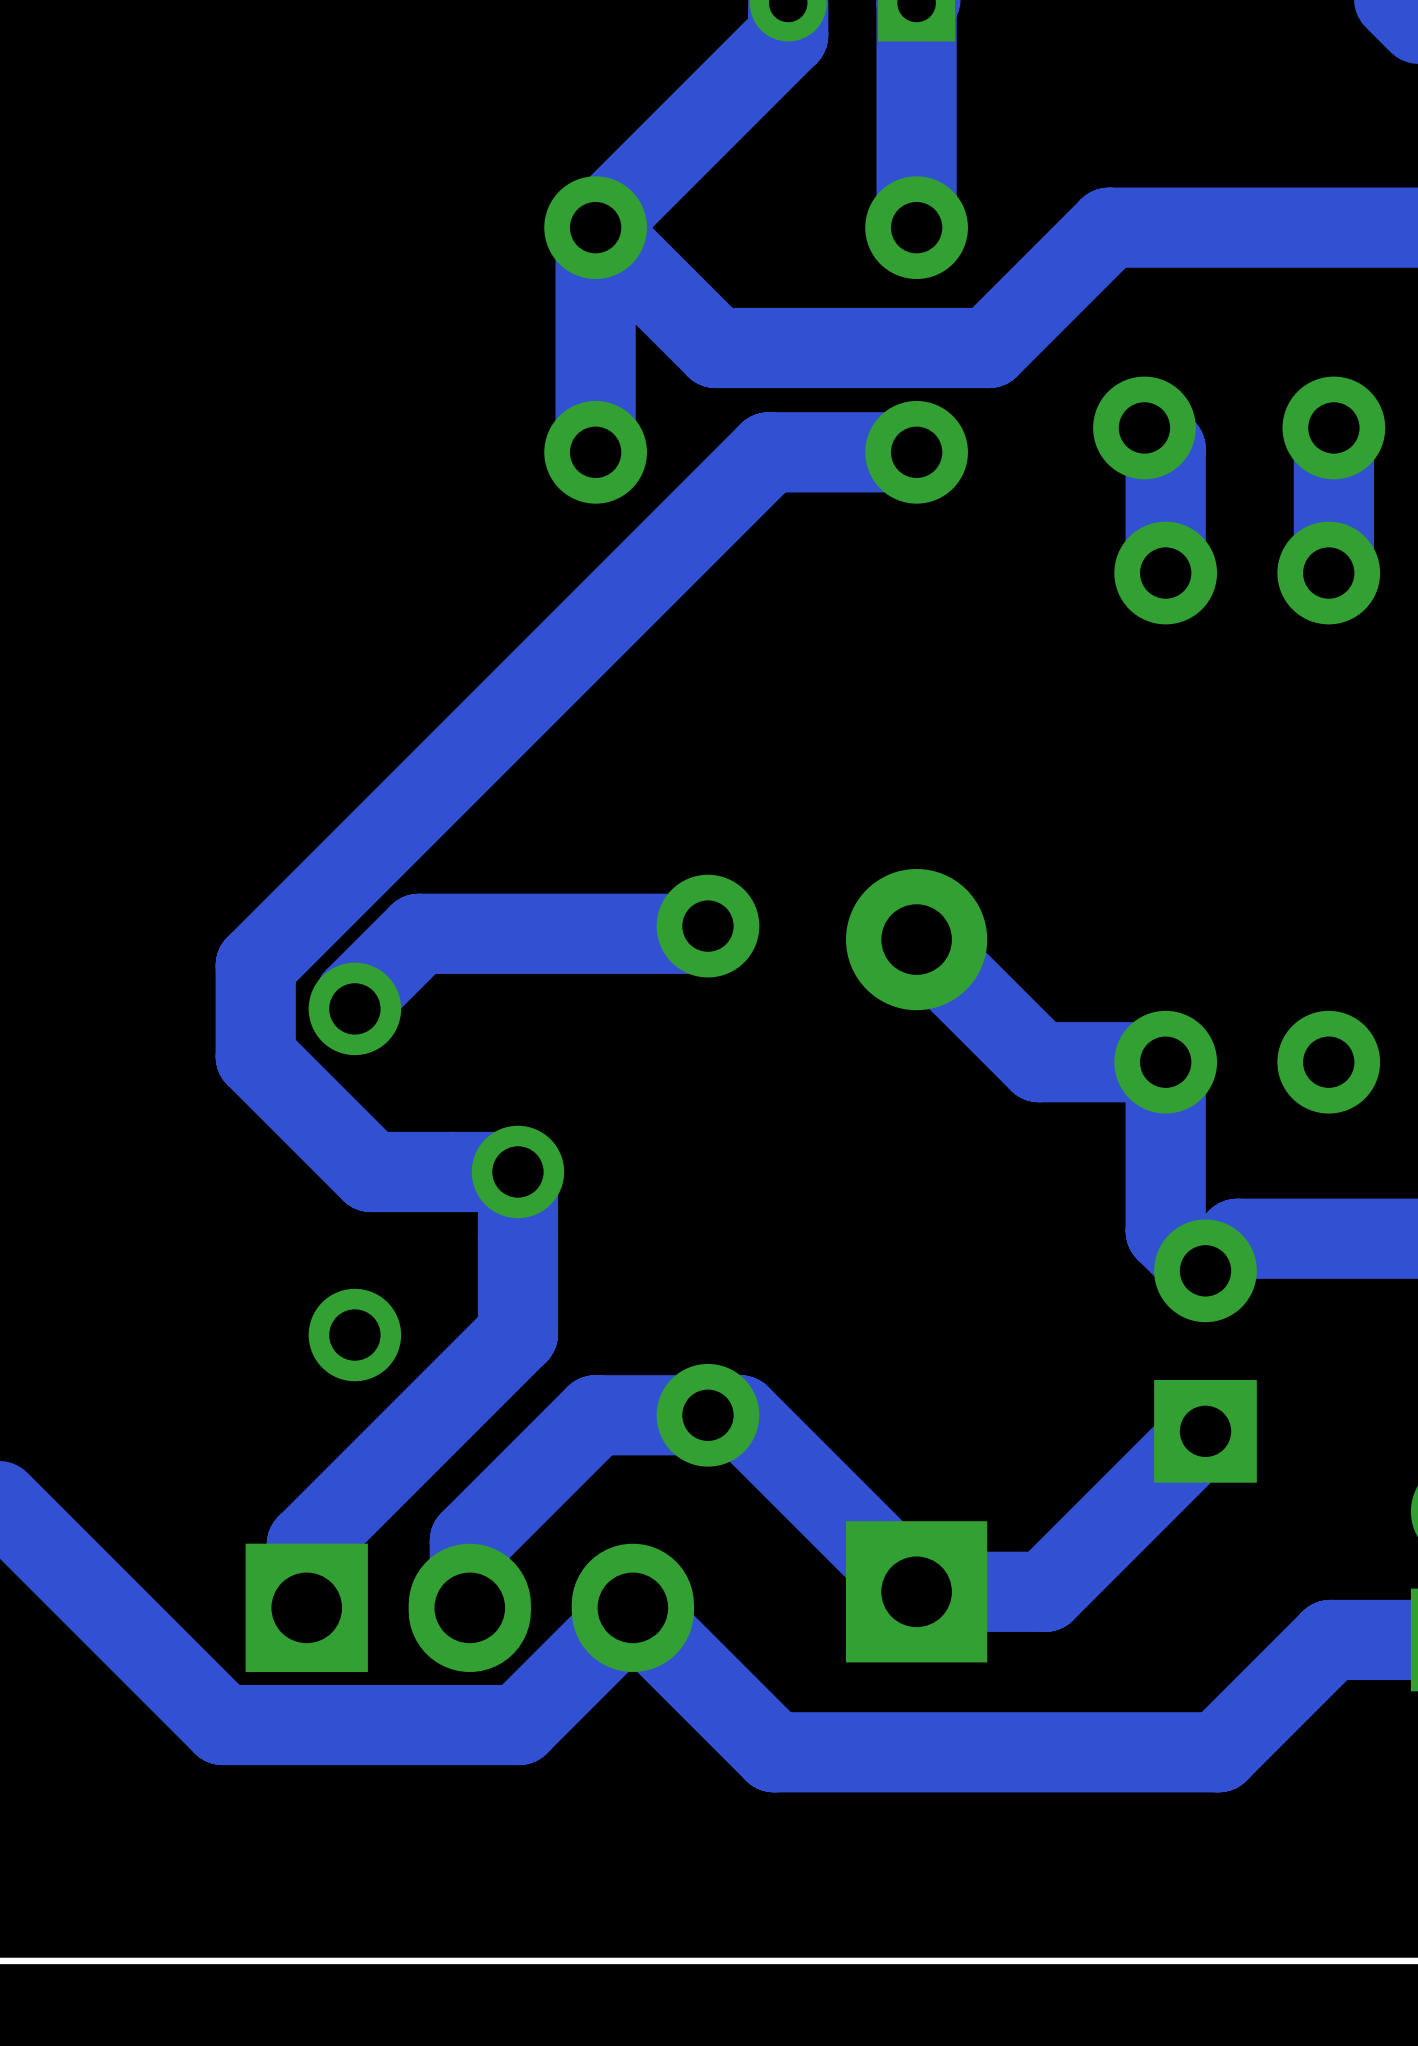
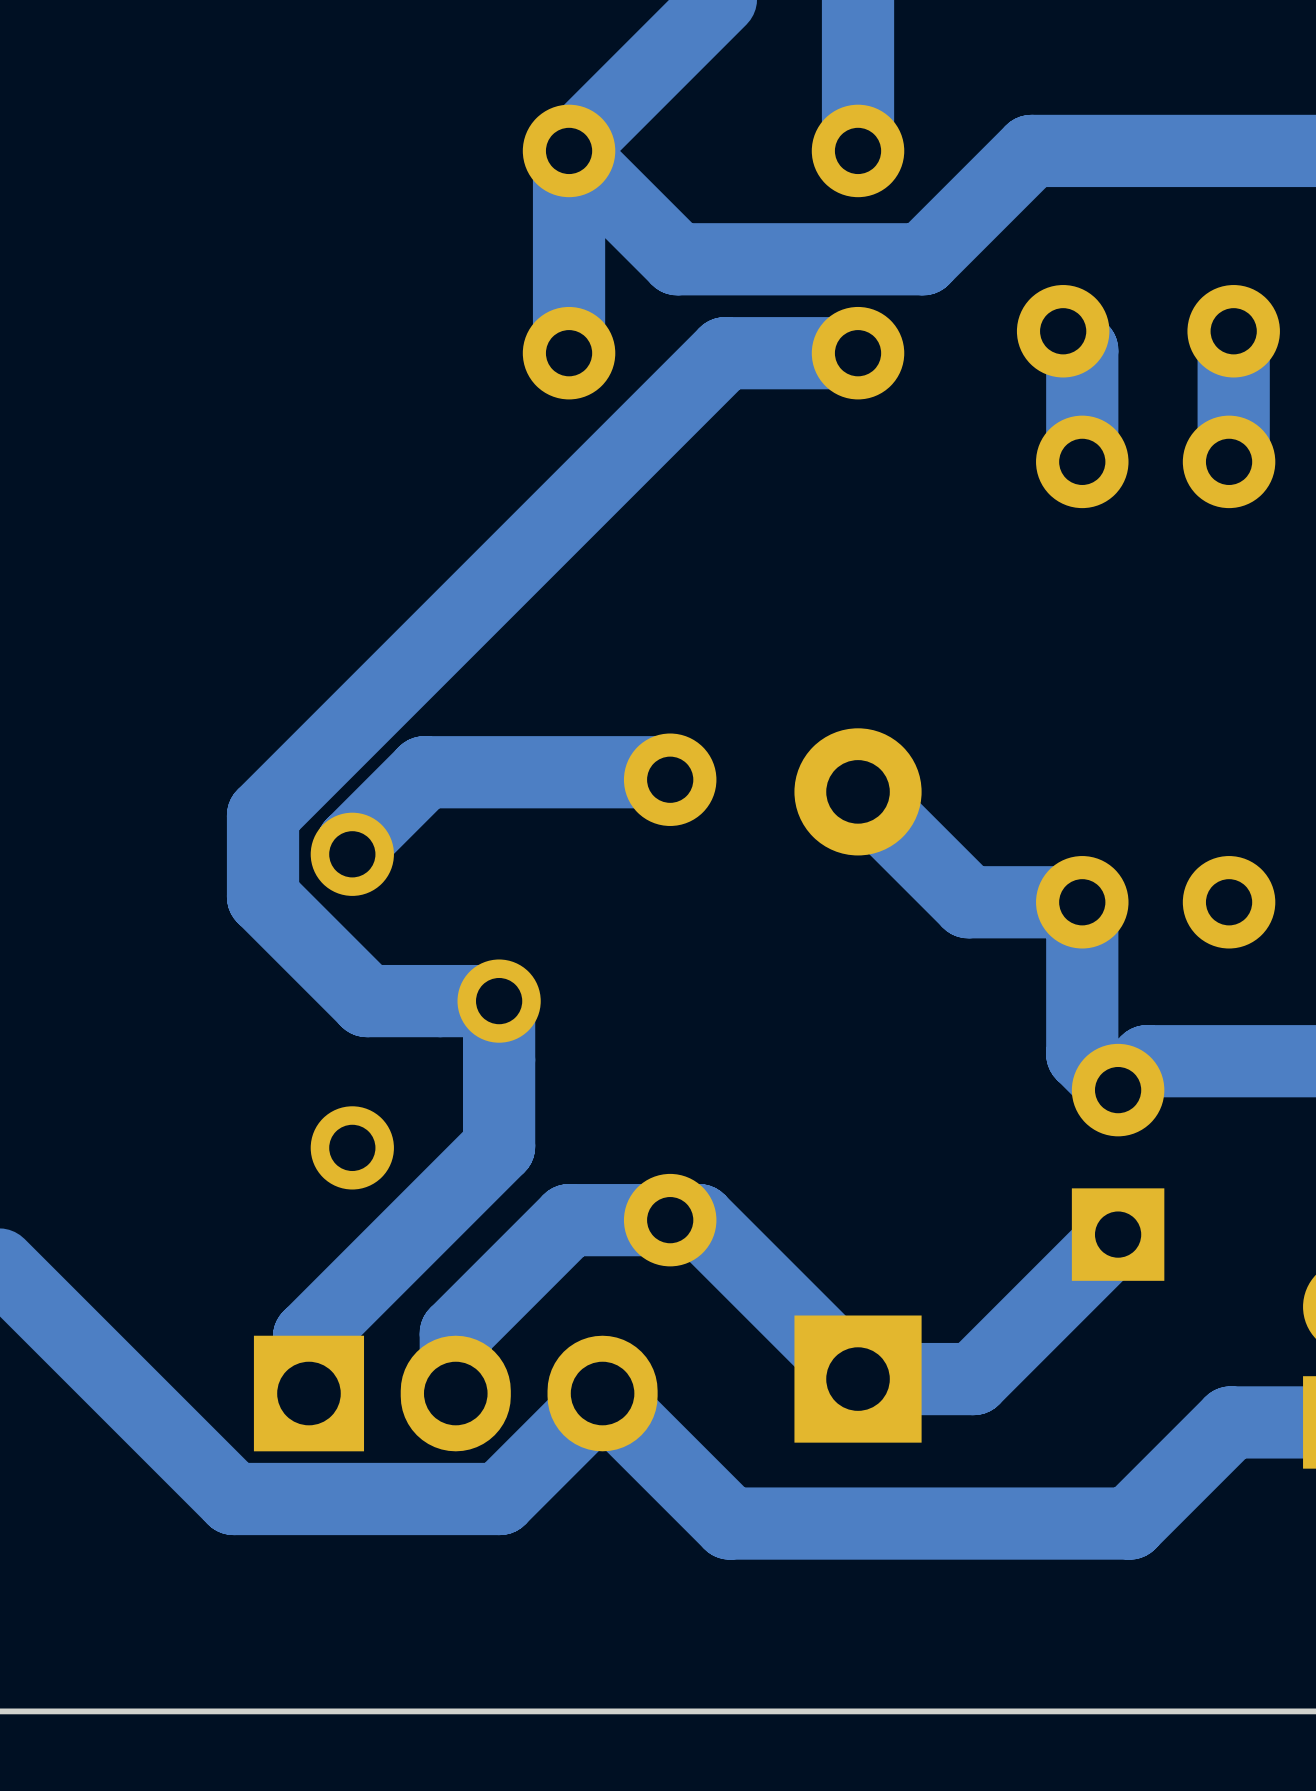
bottom track: (707, 926) (700, 933) (419, 933) -> (670, 779) (662, 772) (424, 772) (410, 786)

